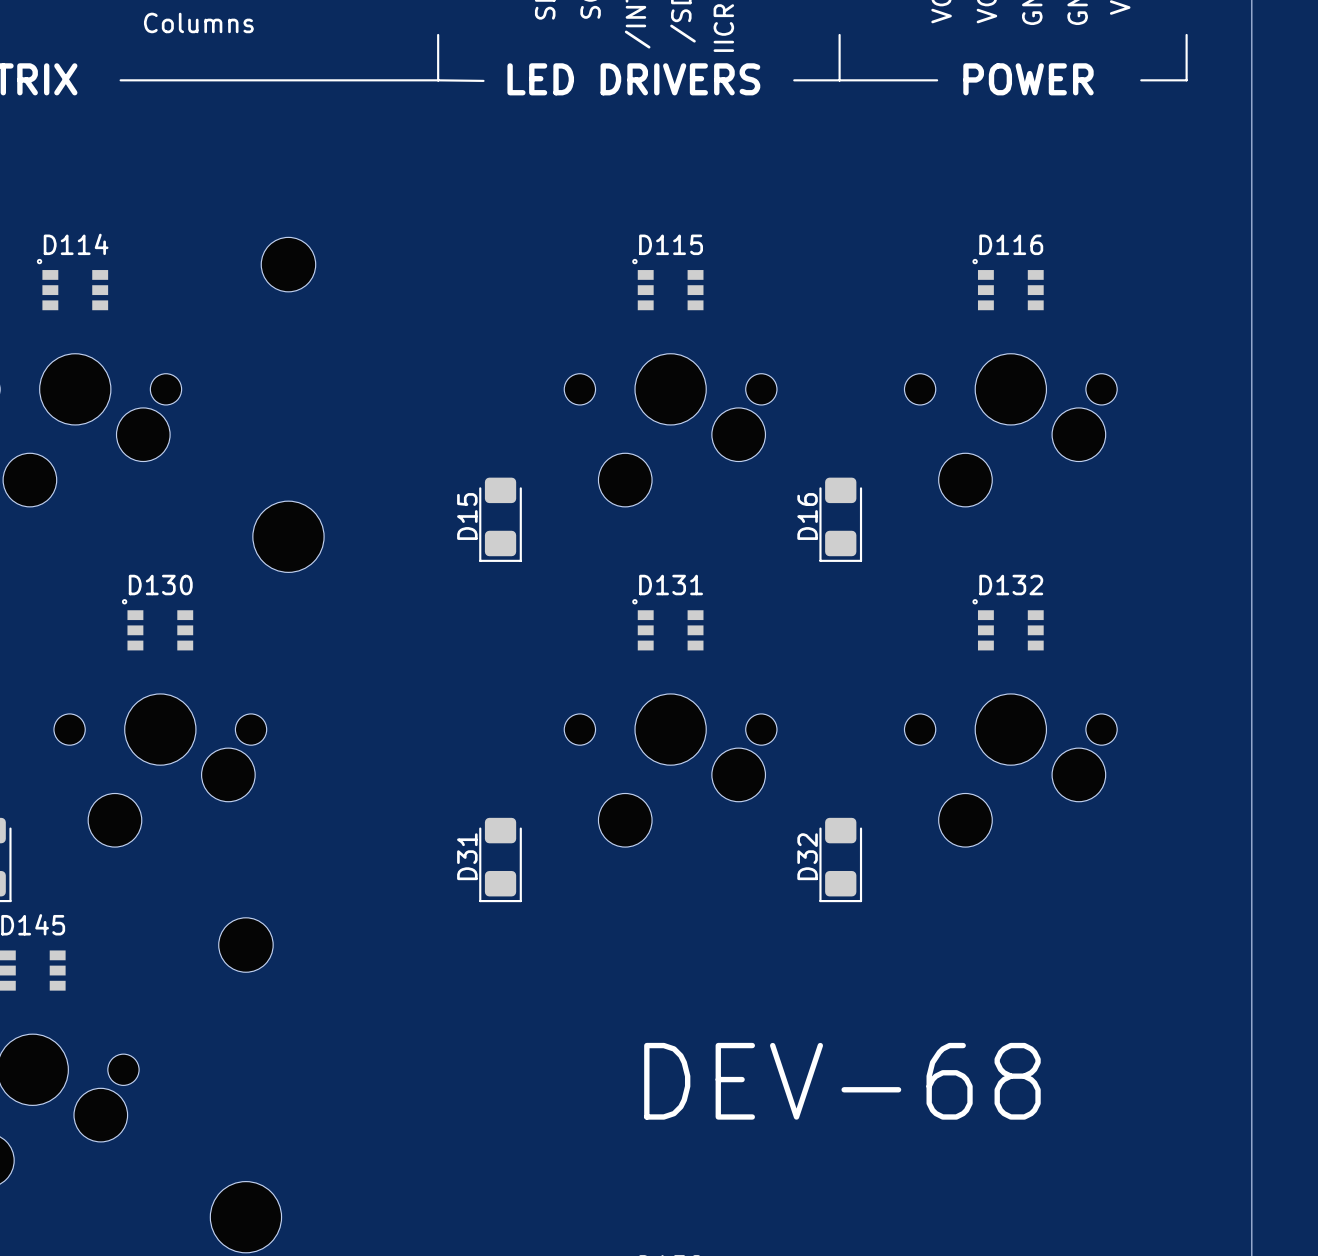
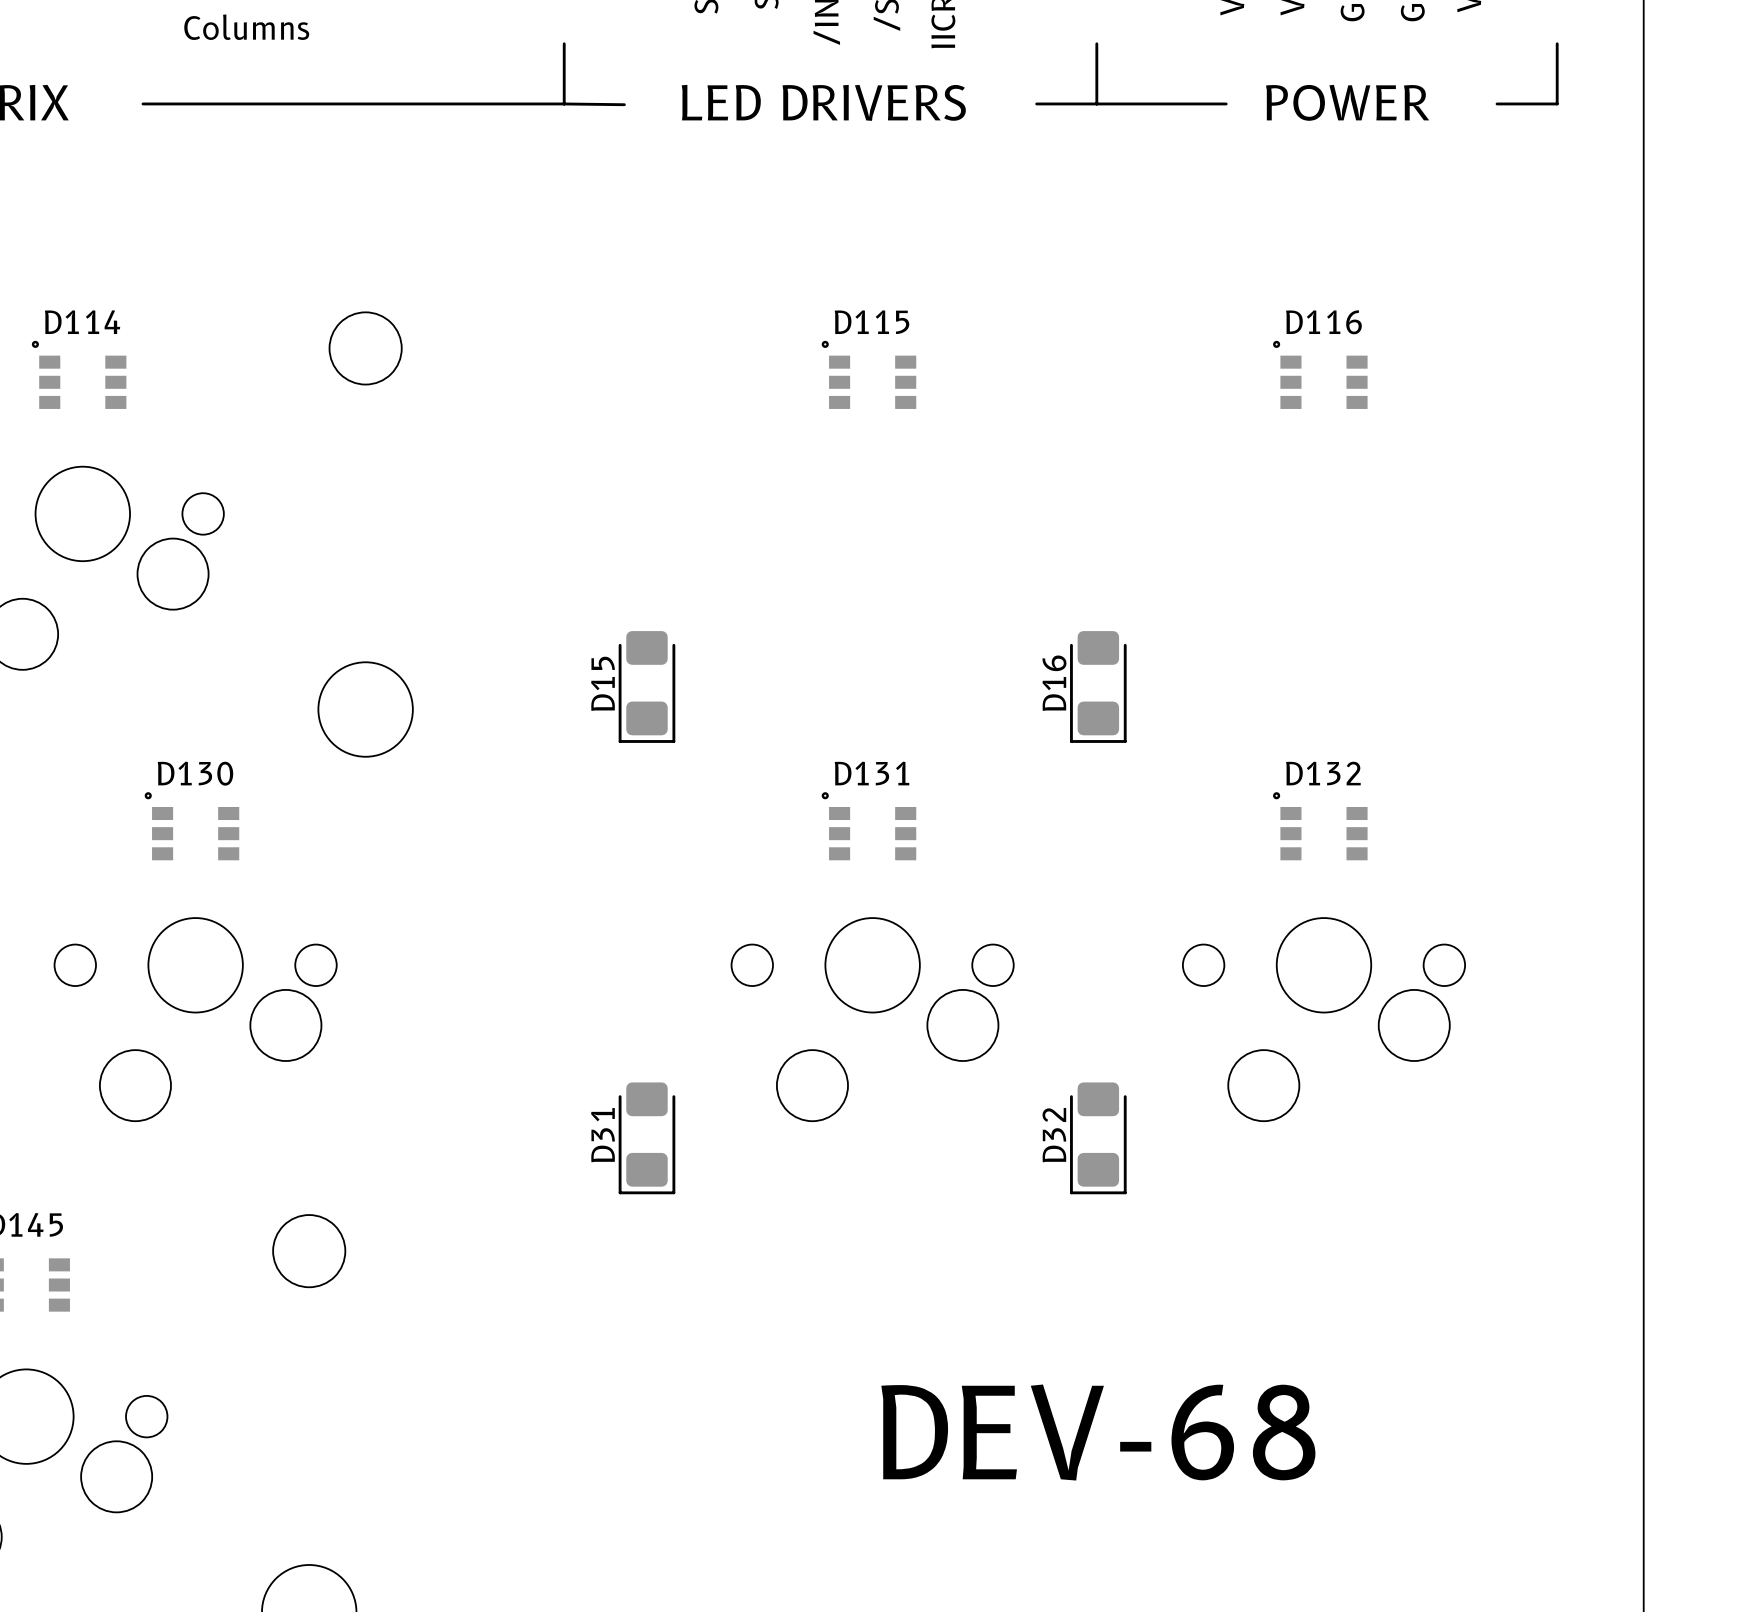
part: (670, 430) -> none
part: (1010, 430) -> none

